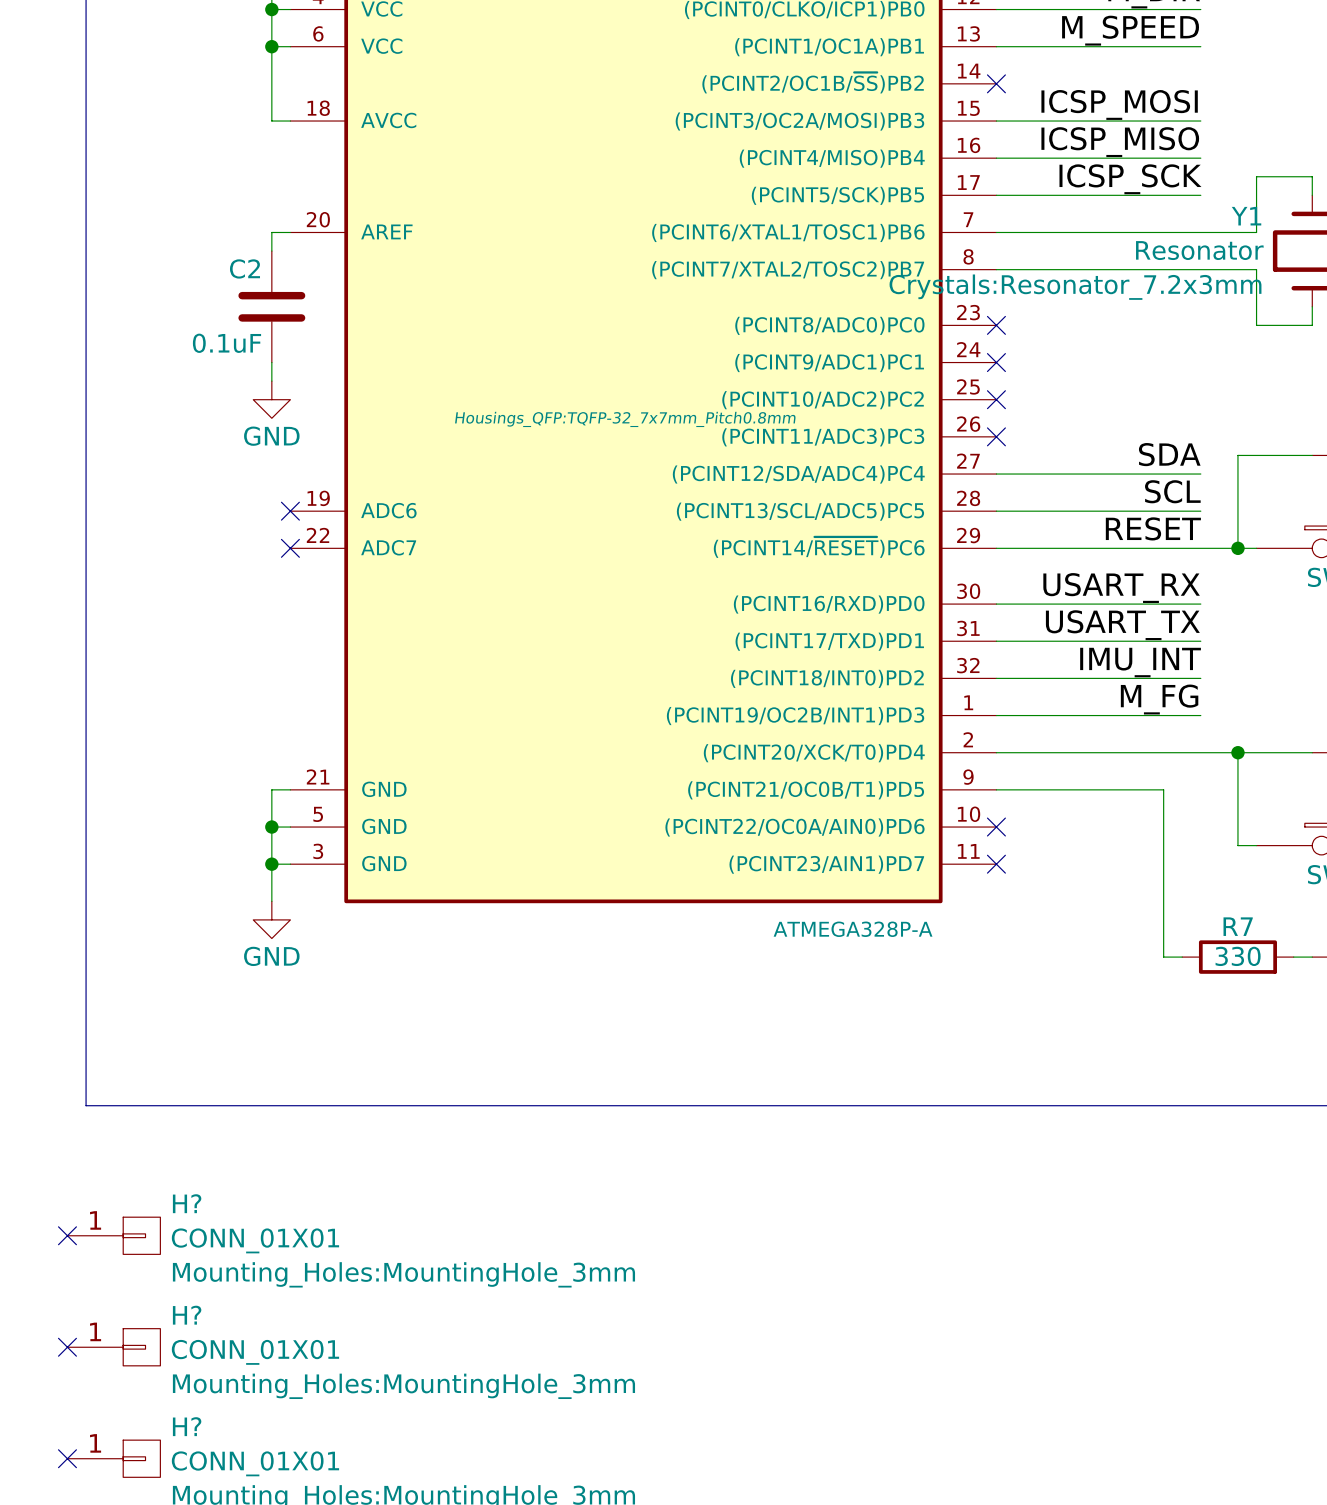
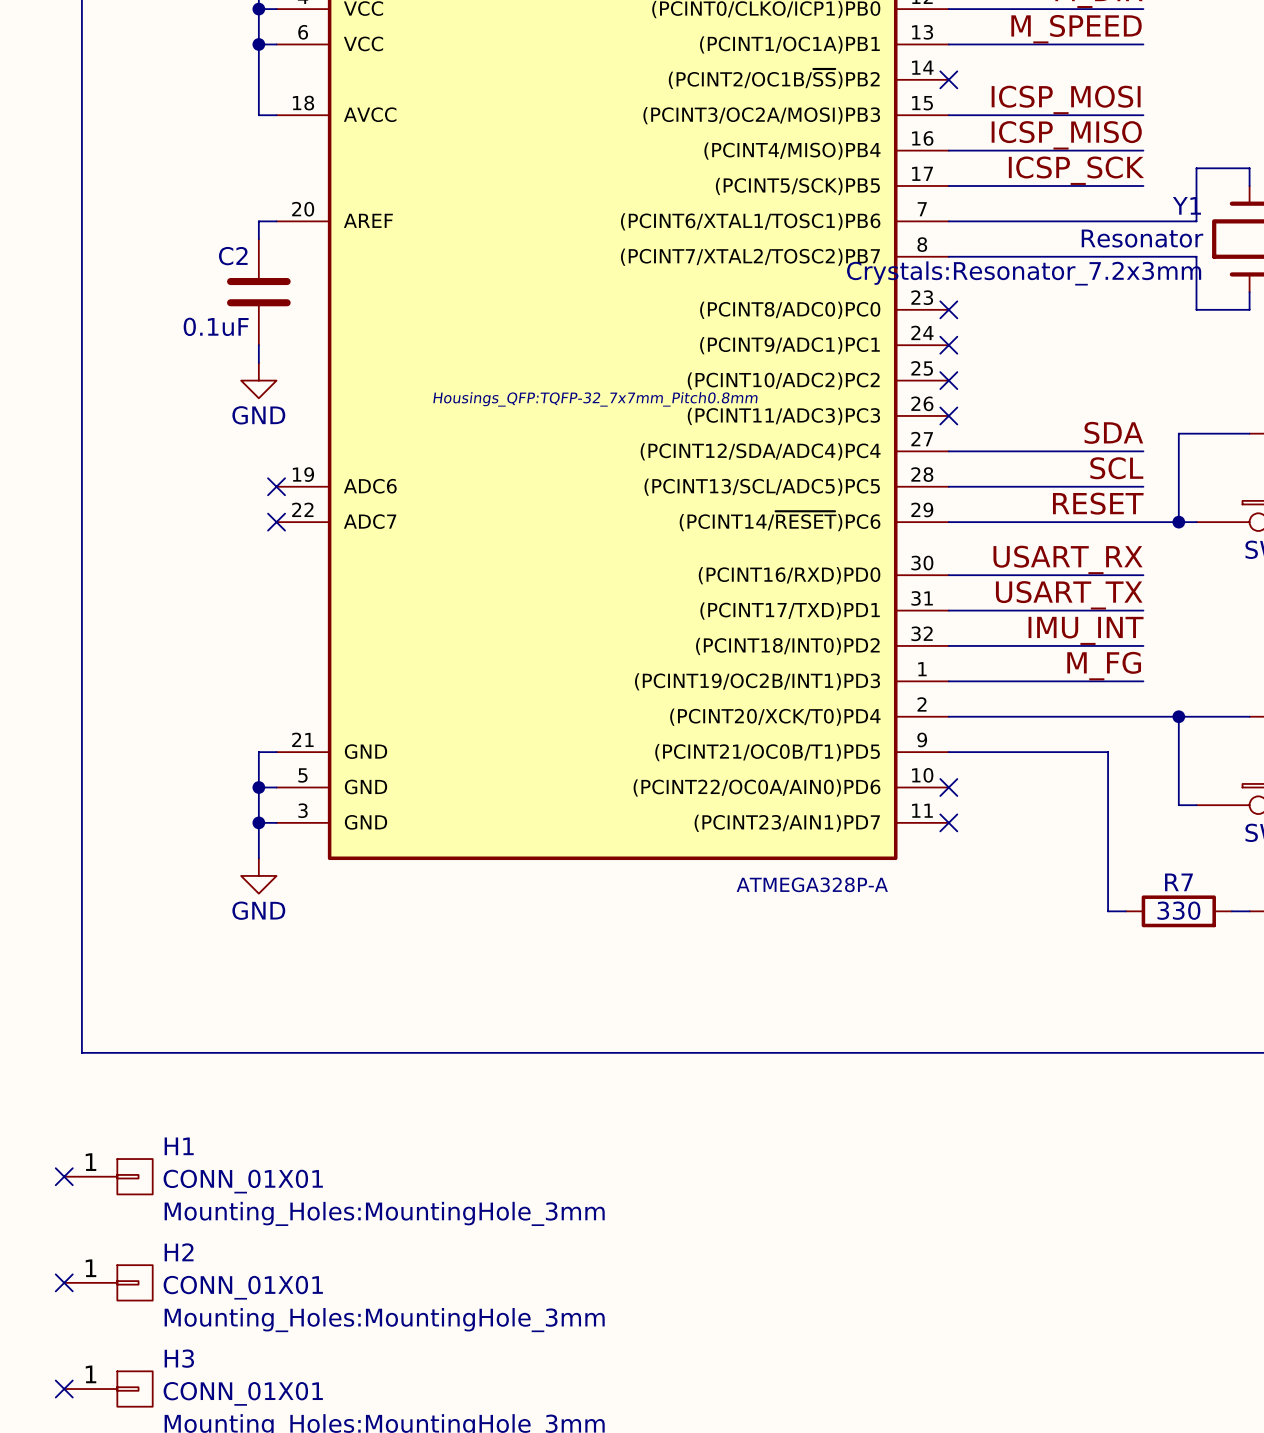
H? name: H? (187, 1203) -> H1 (179, 1146)
H? name: H? (187, 1315) -> H2 (179, 1252)
H? name: H? (187, 1426) -> H3 (179, 1358)

